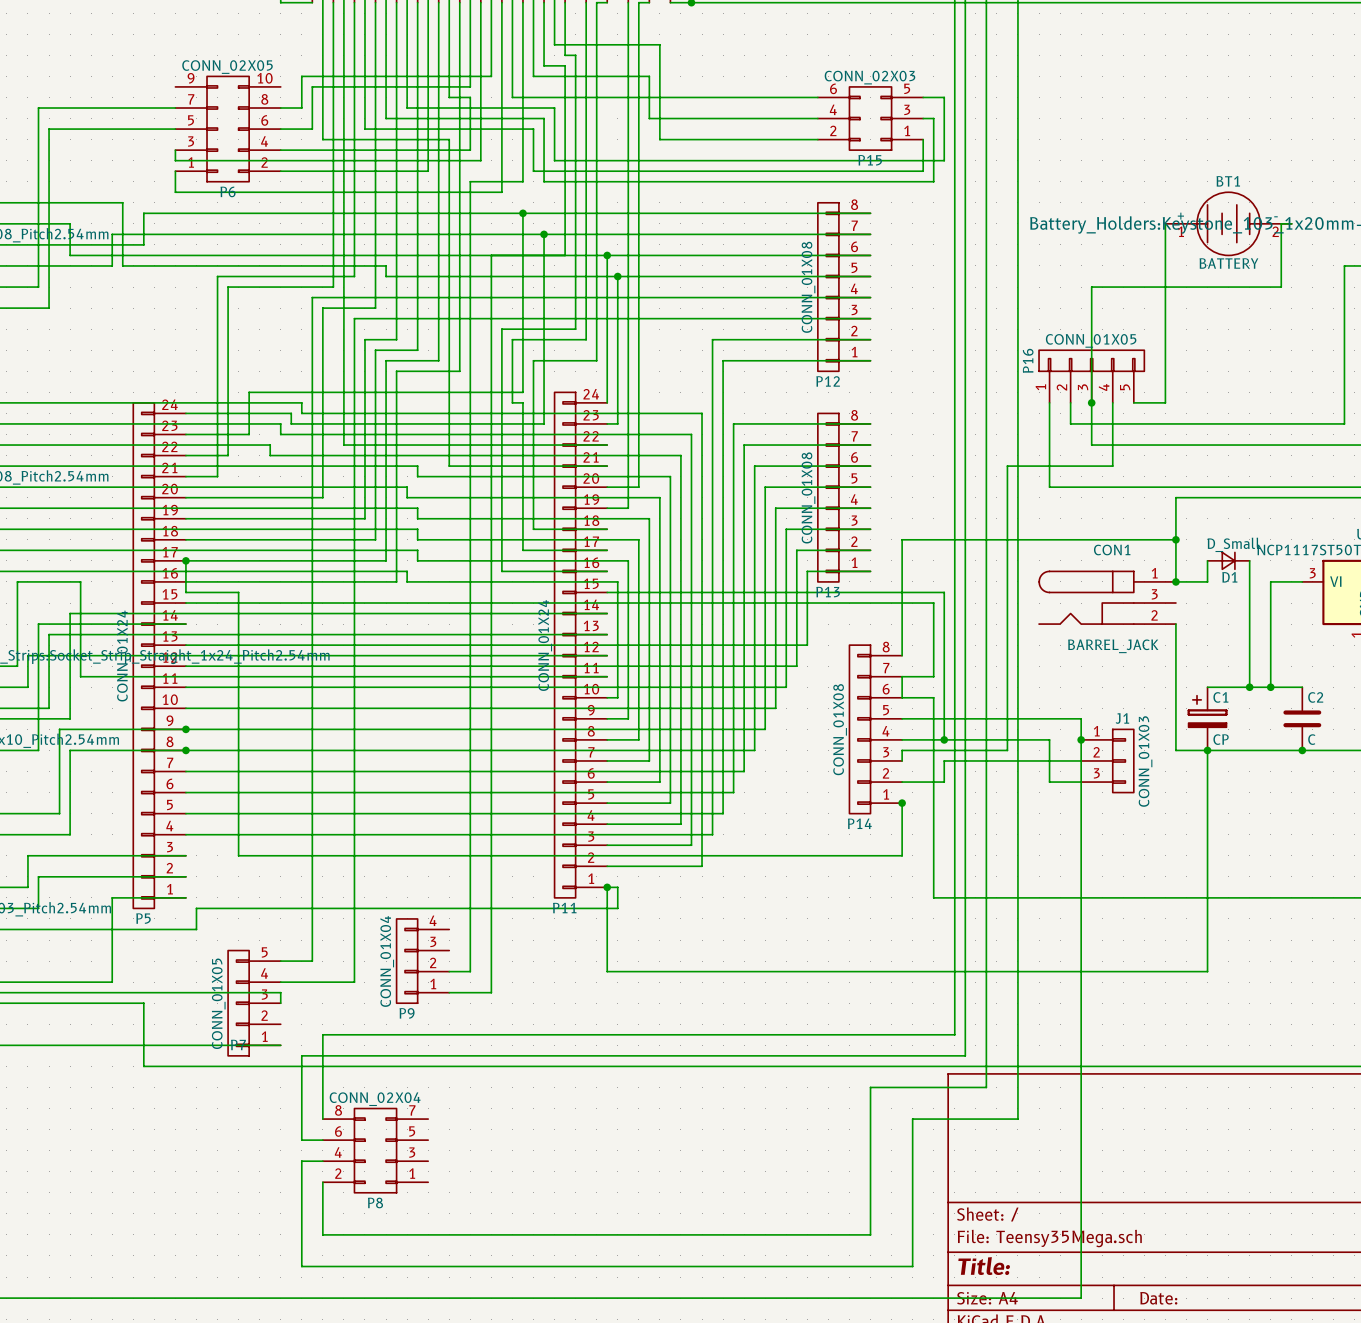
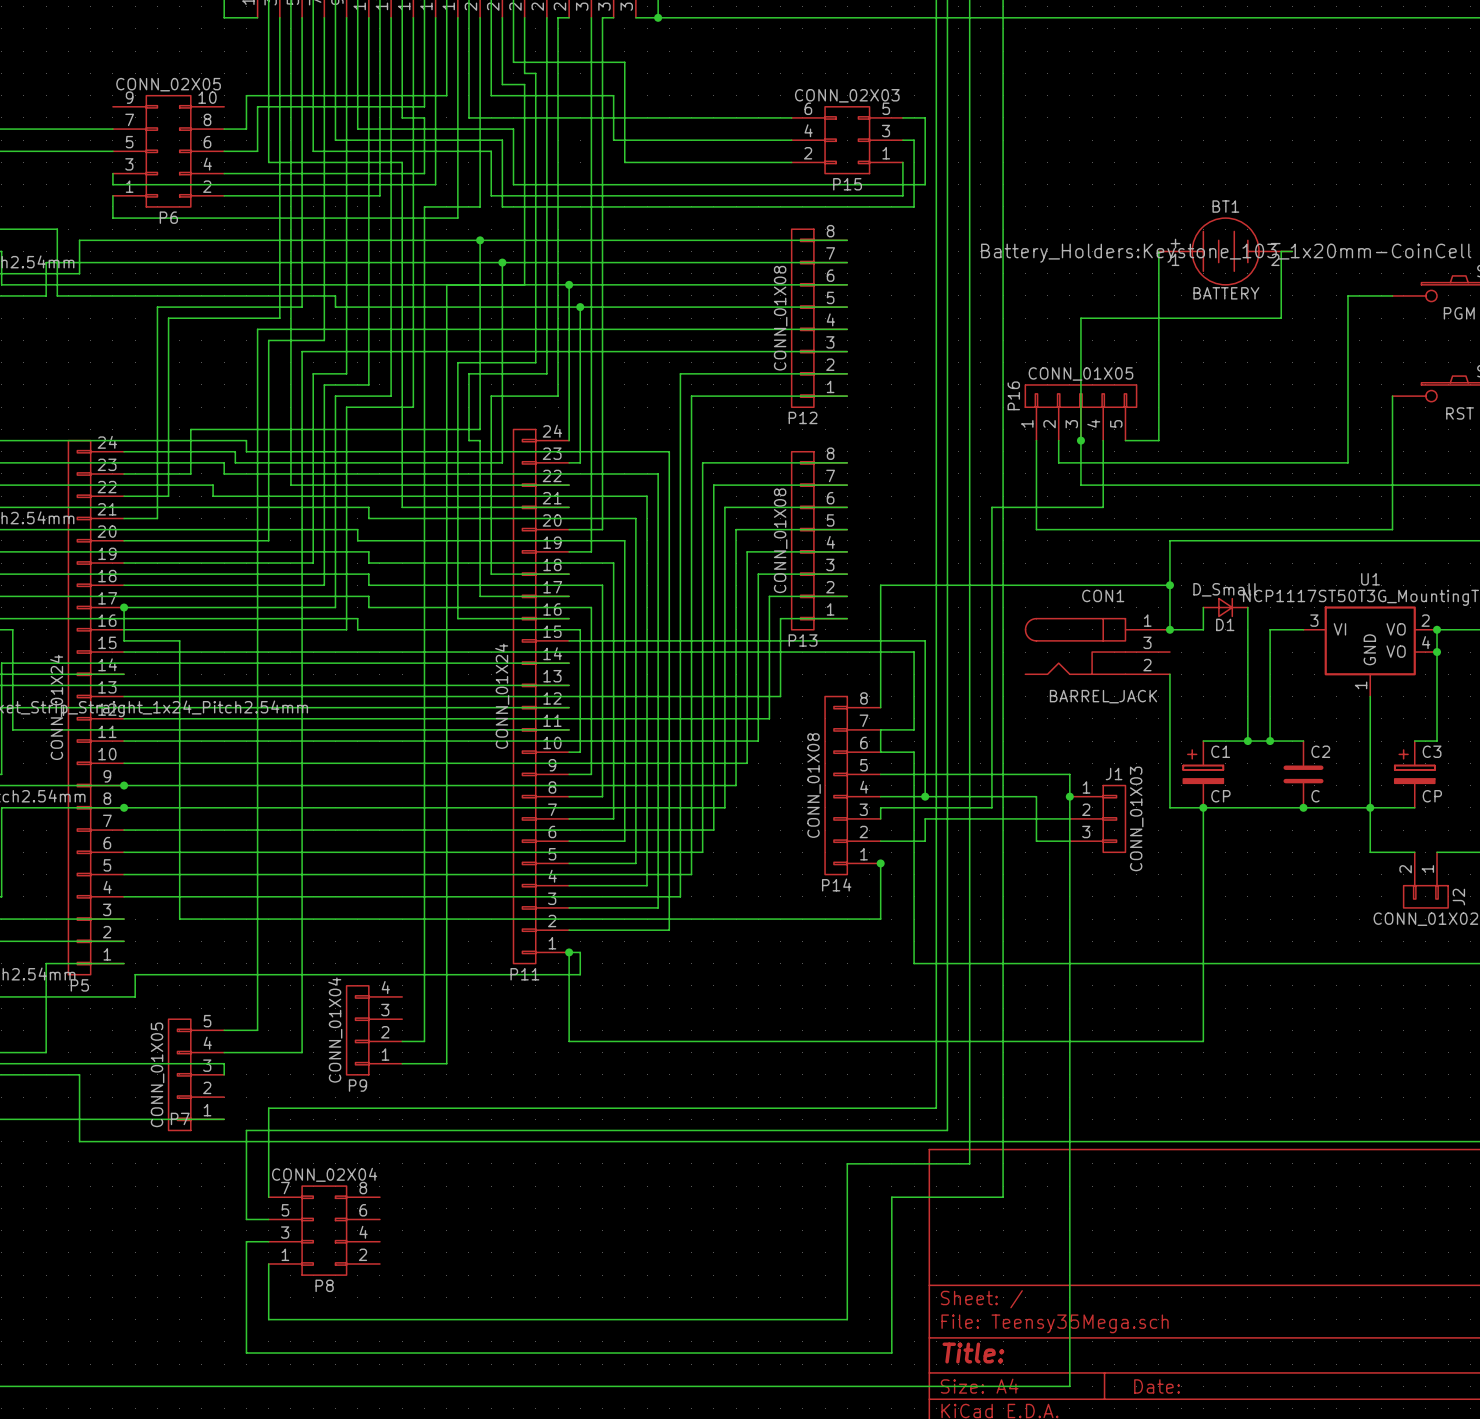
P8 flip: as is (375, 1150) -> left-right (324, 1230)

